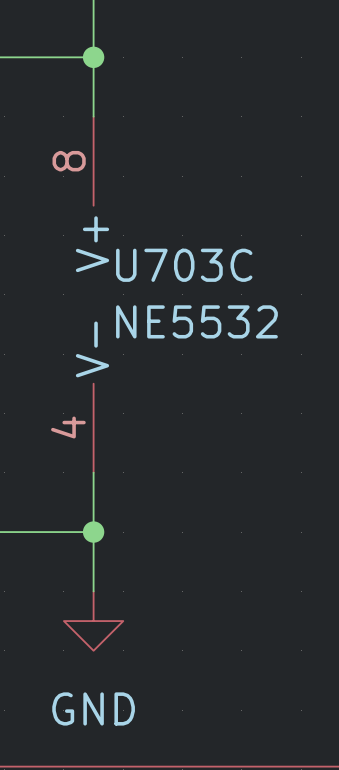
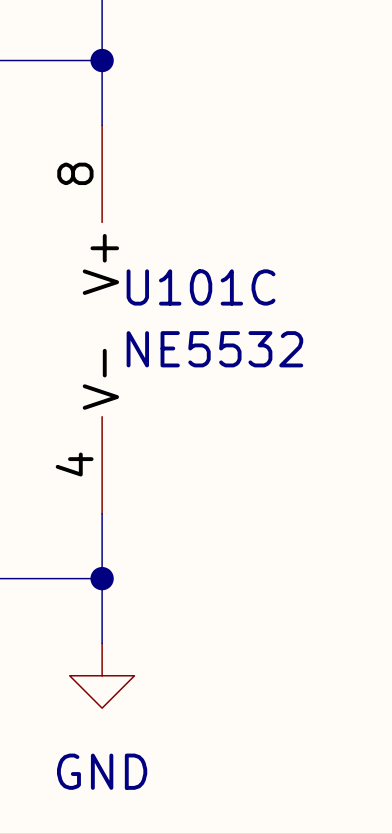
U703C name: U703C (184, 265) -> U101C (201, 287)

